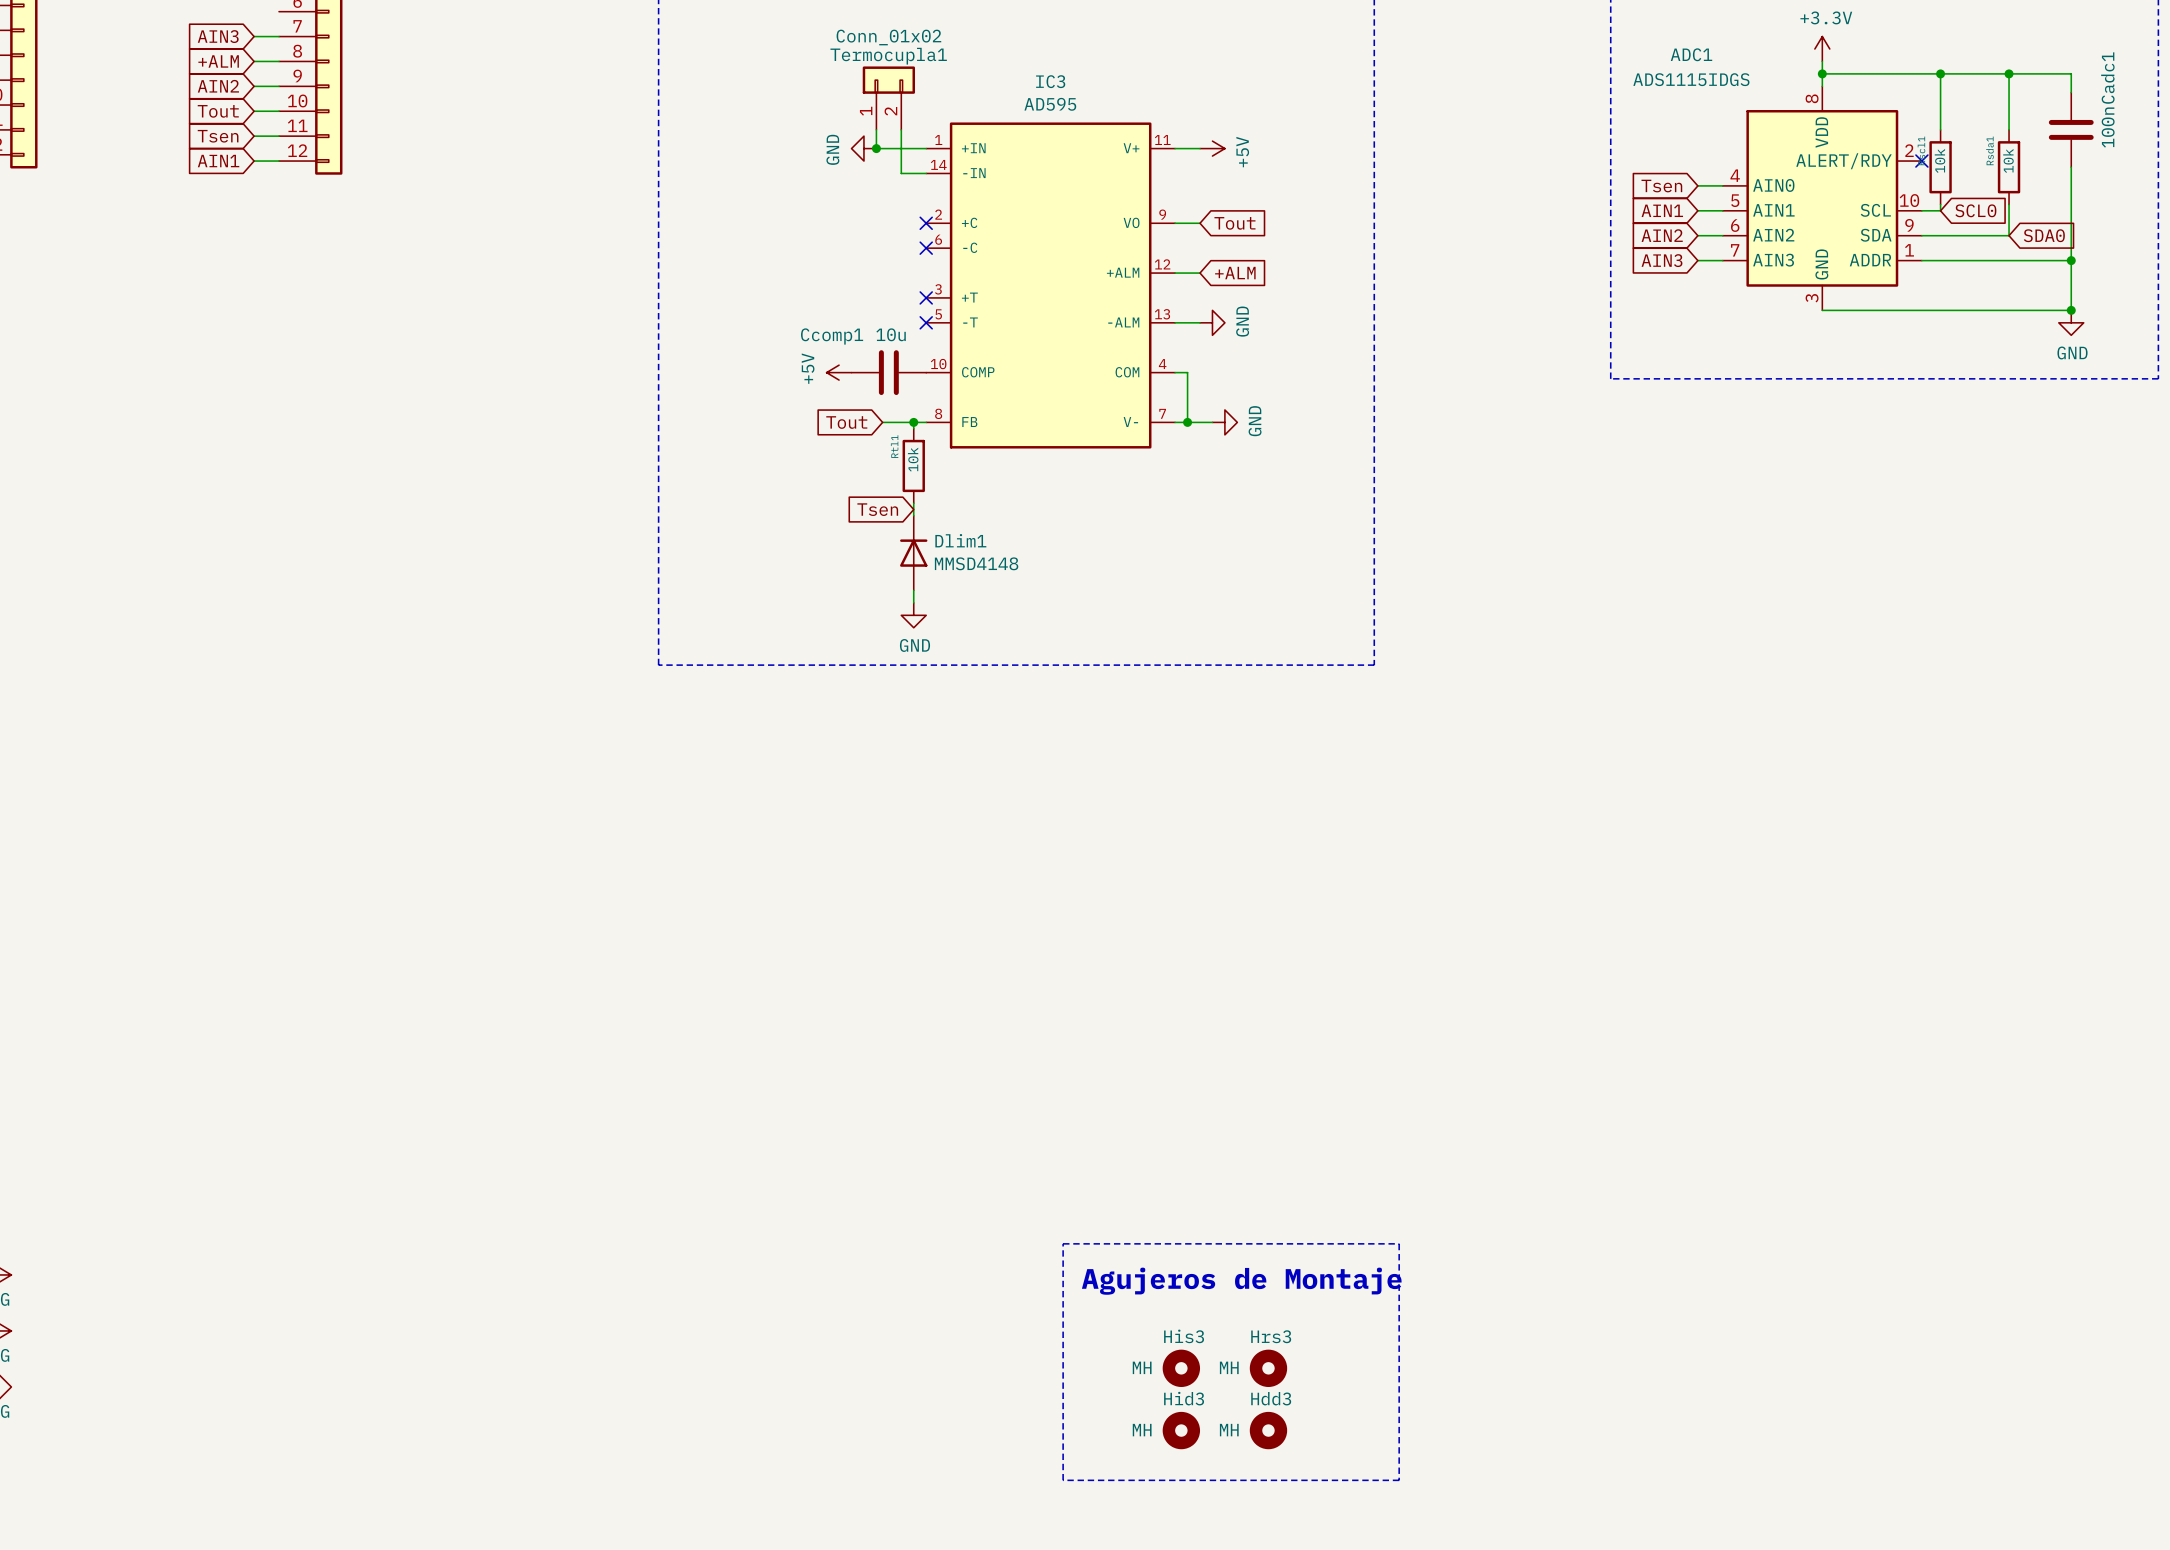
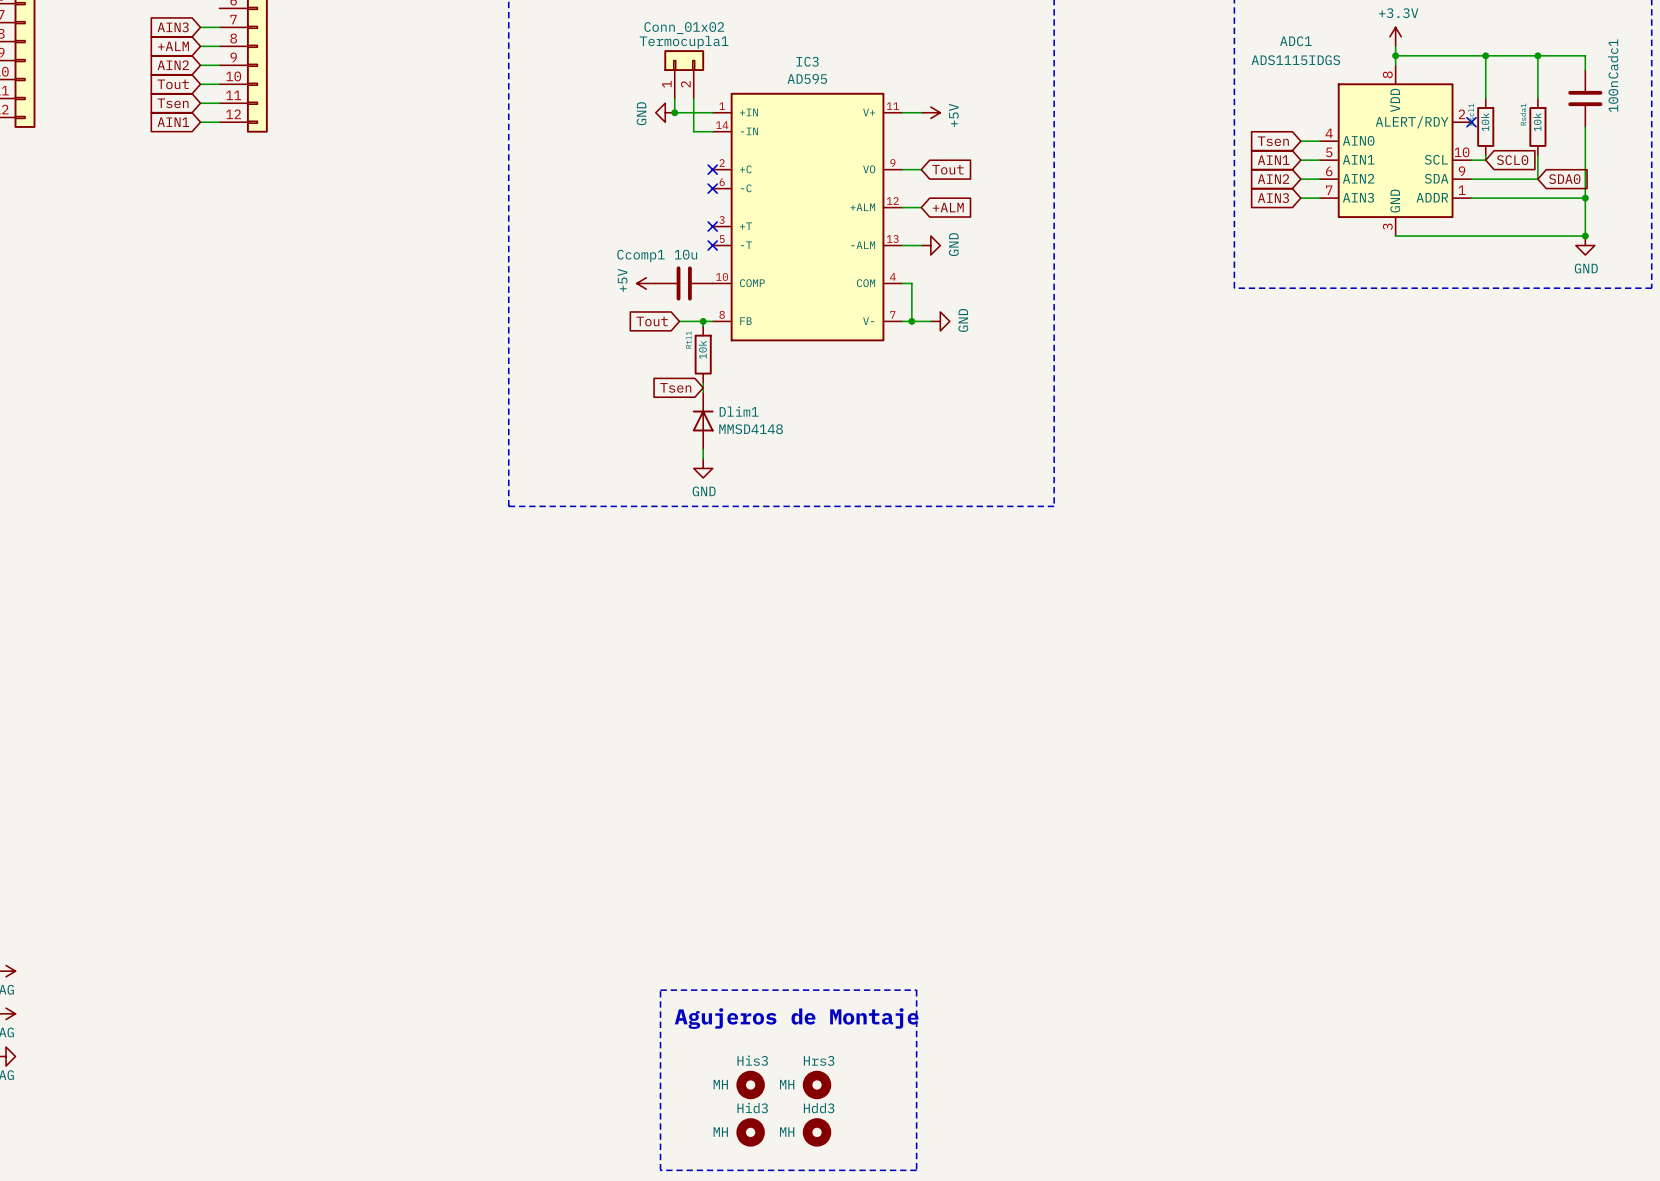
line: (1063, 1243) (1399, 1243) (1399, 1480) (1063, 1480) (1063, 1243) -> (660, 990) (916, 990) (916, 1170) (660, 1170) (660, 990)
text position: Agujeros de Montaje (1241, 1281) -> Agujeros de Montaje (796, 1018)
His3 position: (1181, 1368) -> (750, 1084)
Hrs3 position: (1268, 1368) -> (817, 1084)
Hid3 position: (1181, 1430) -> (750, 1132)
Hdd3 position: (1268, 1430) -> (817, 1132)

